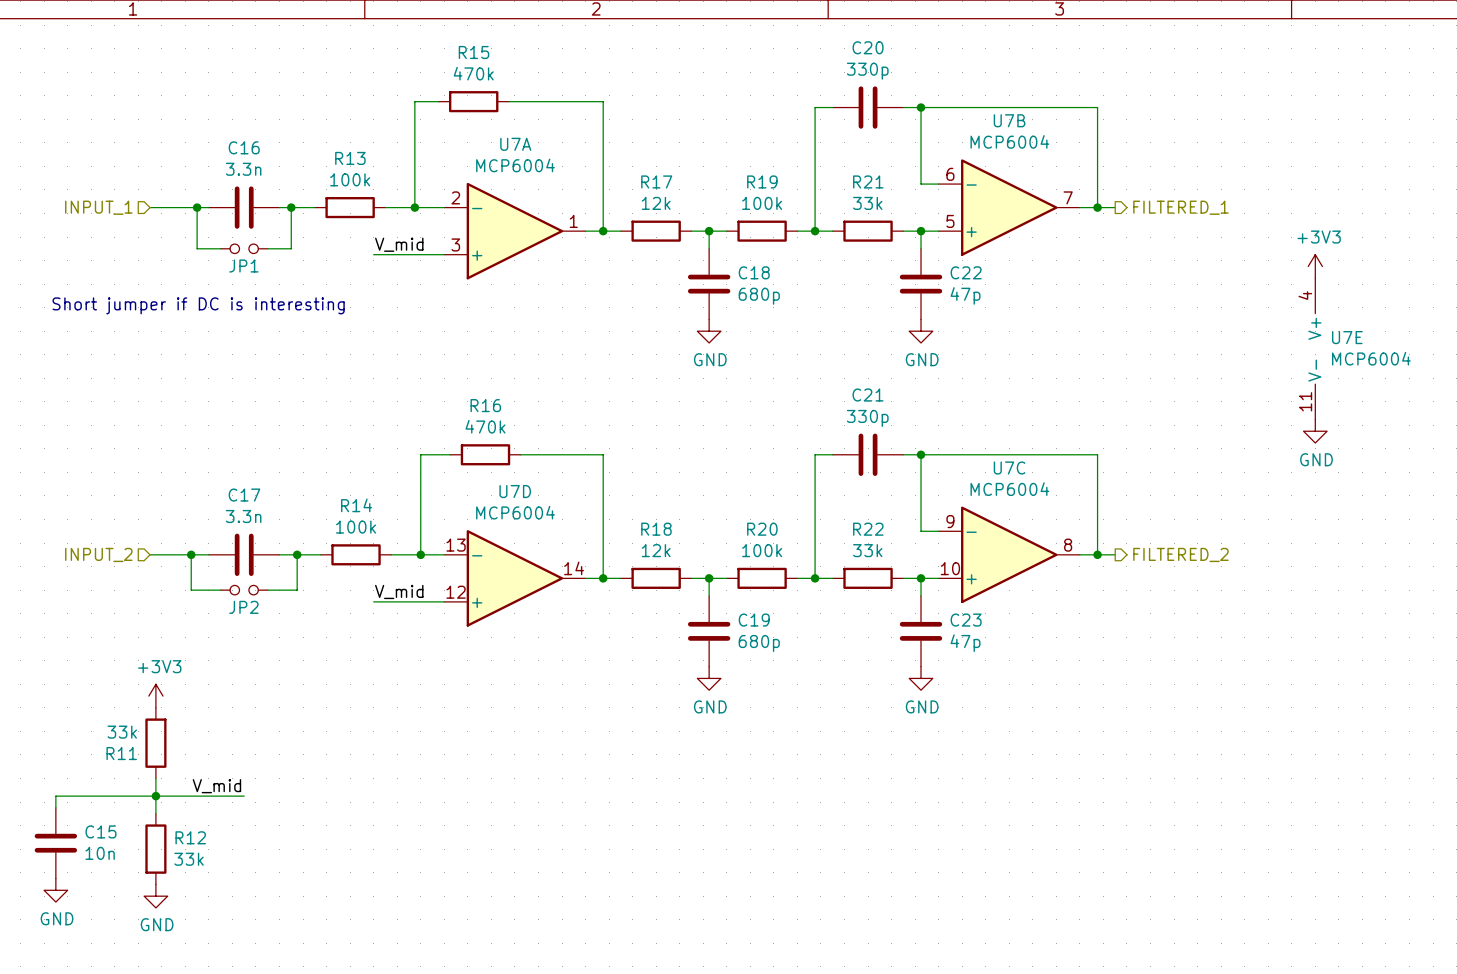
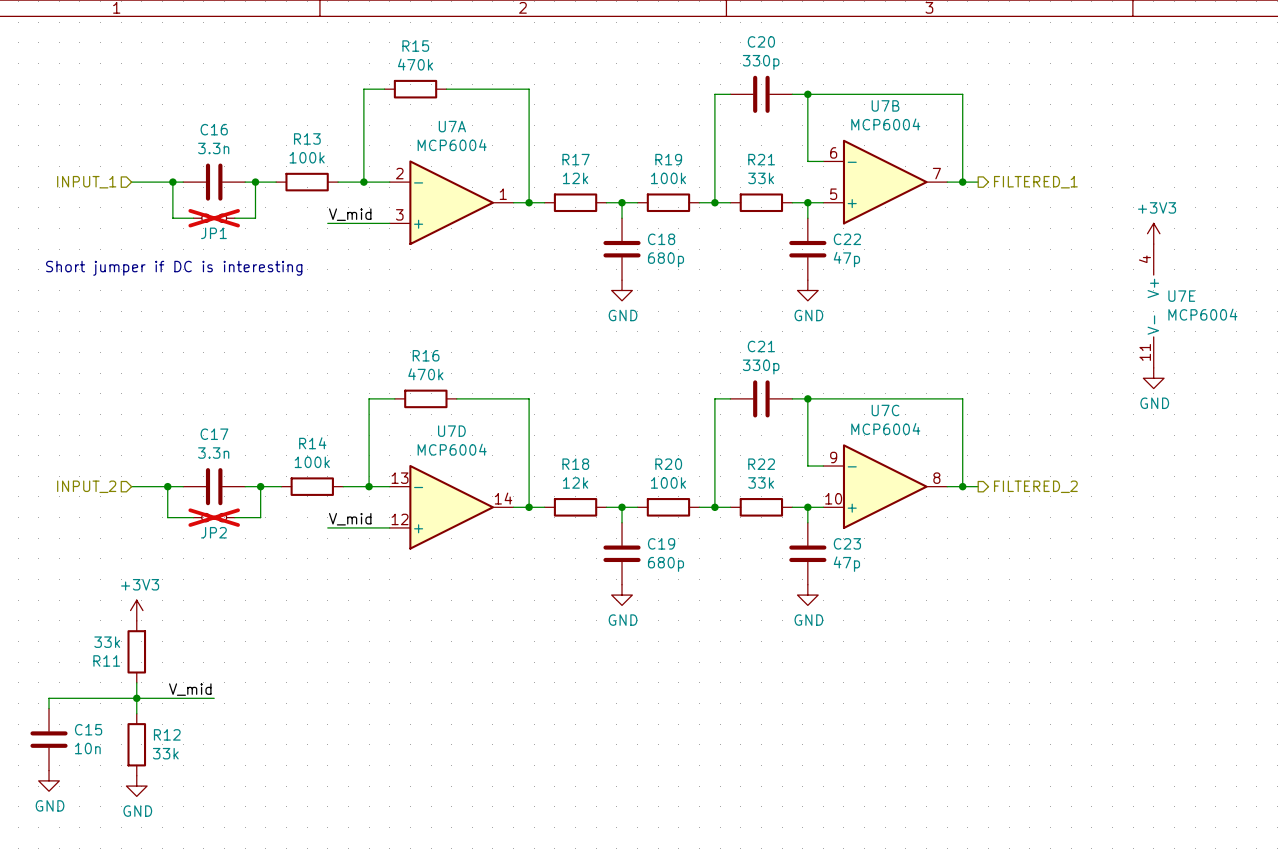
JP1 do-not-place cross: none -> (214, 218)
JP2 do-not-place cross: none -> (214, 517)

